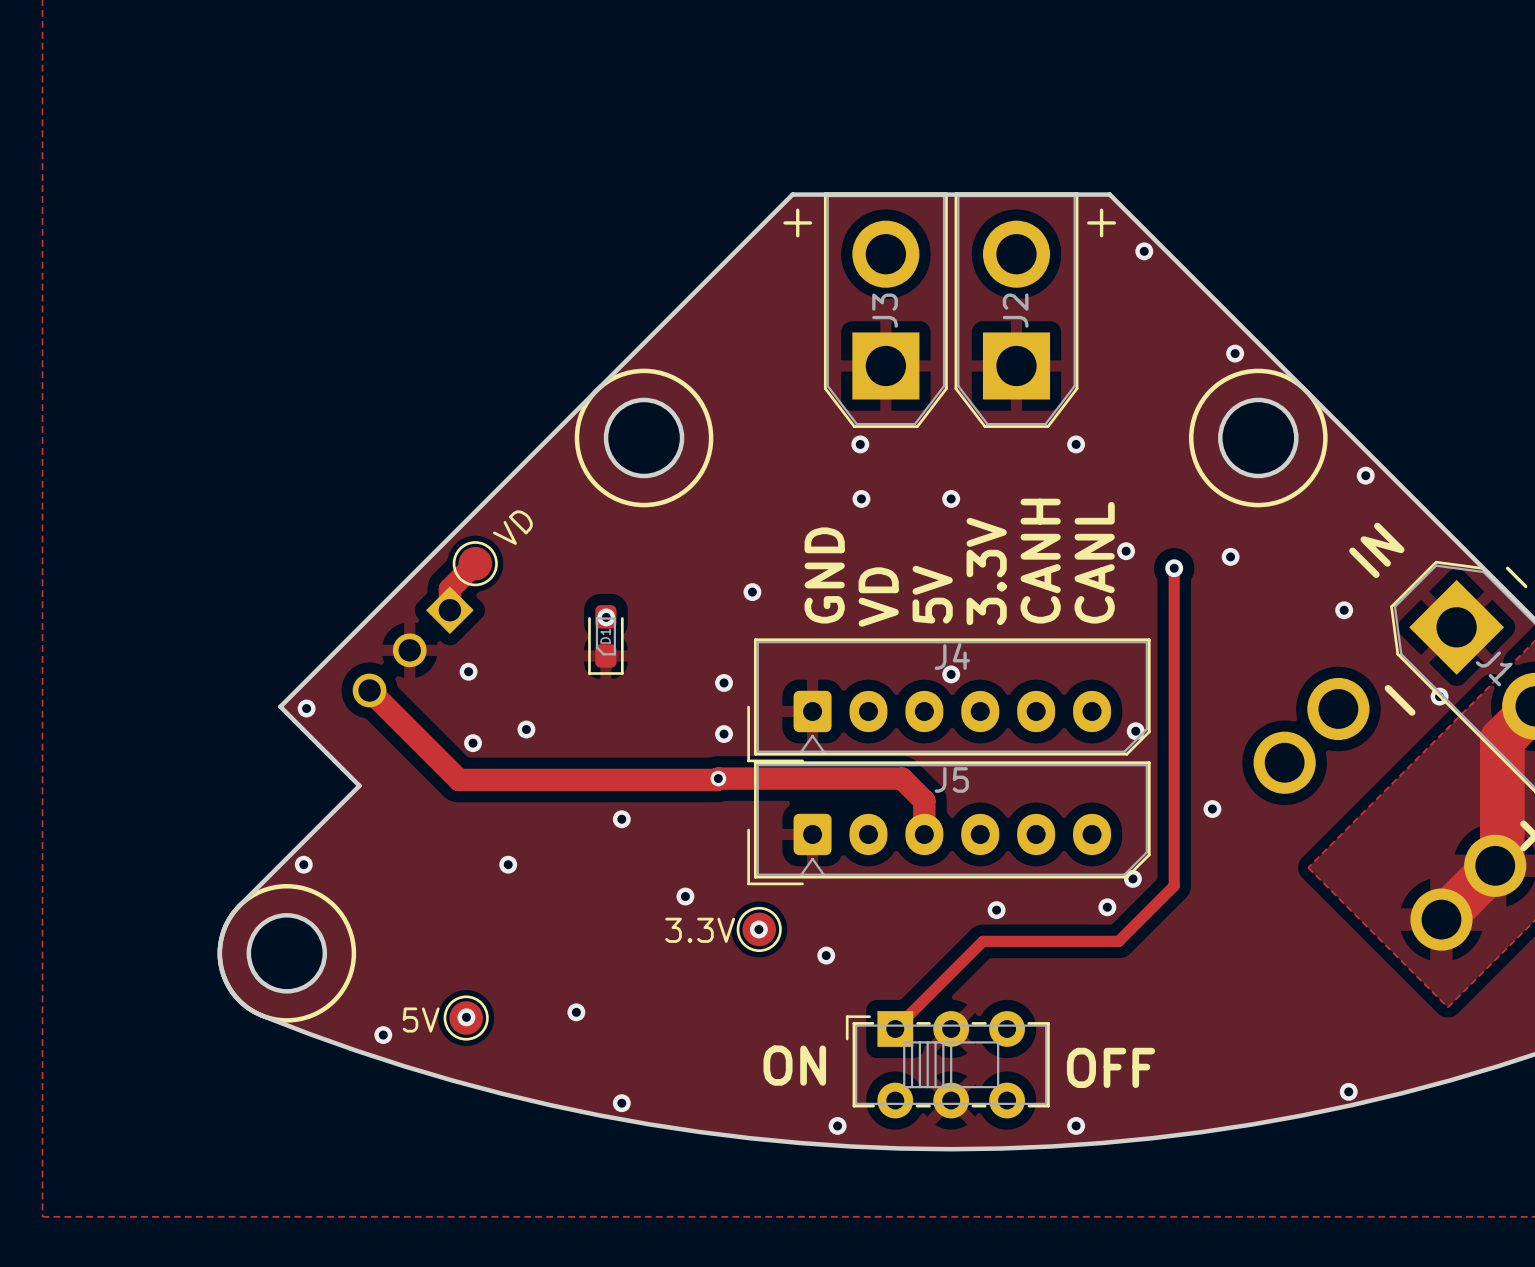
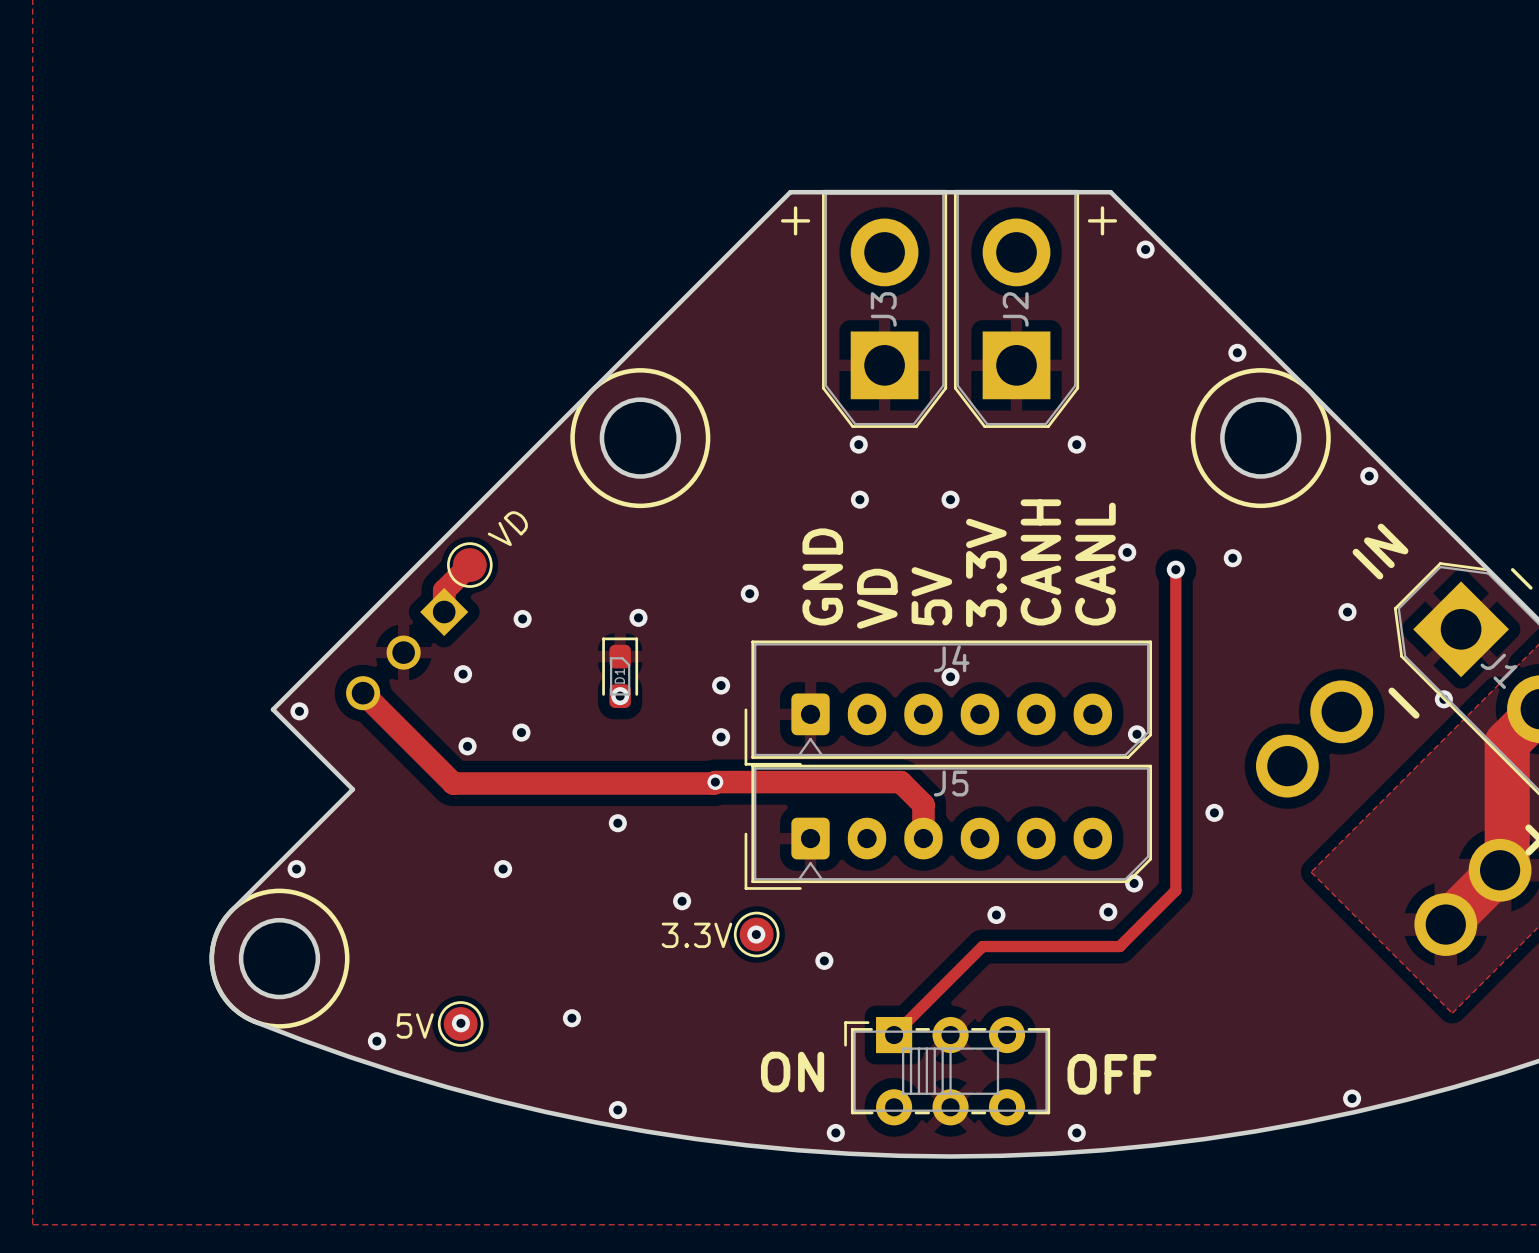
via: none -> (522, 618)
via position: (606, 617) -> (638, 617)
D1 rotation: 0° (605, 639) -> 180° (620, 672)
via: none -> (620, 696)

